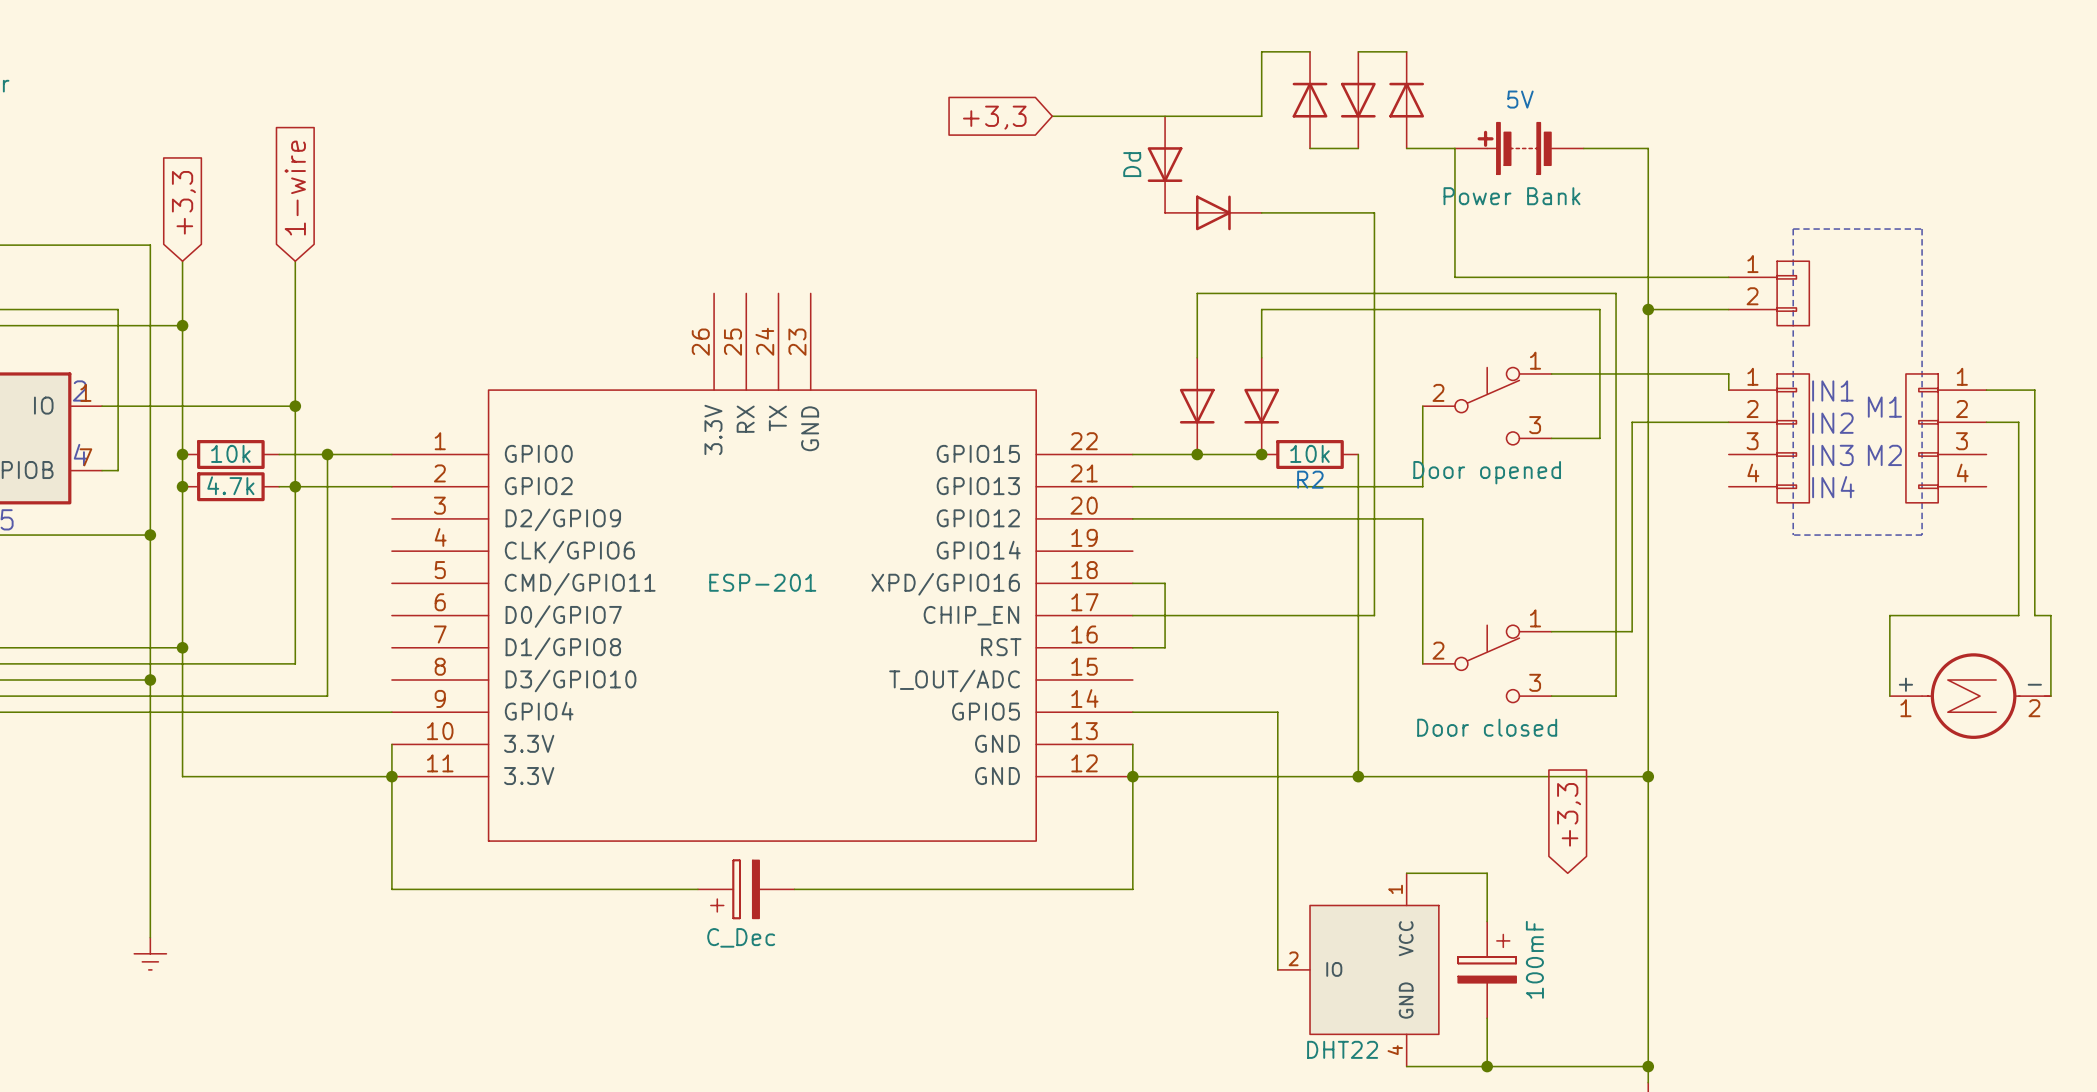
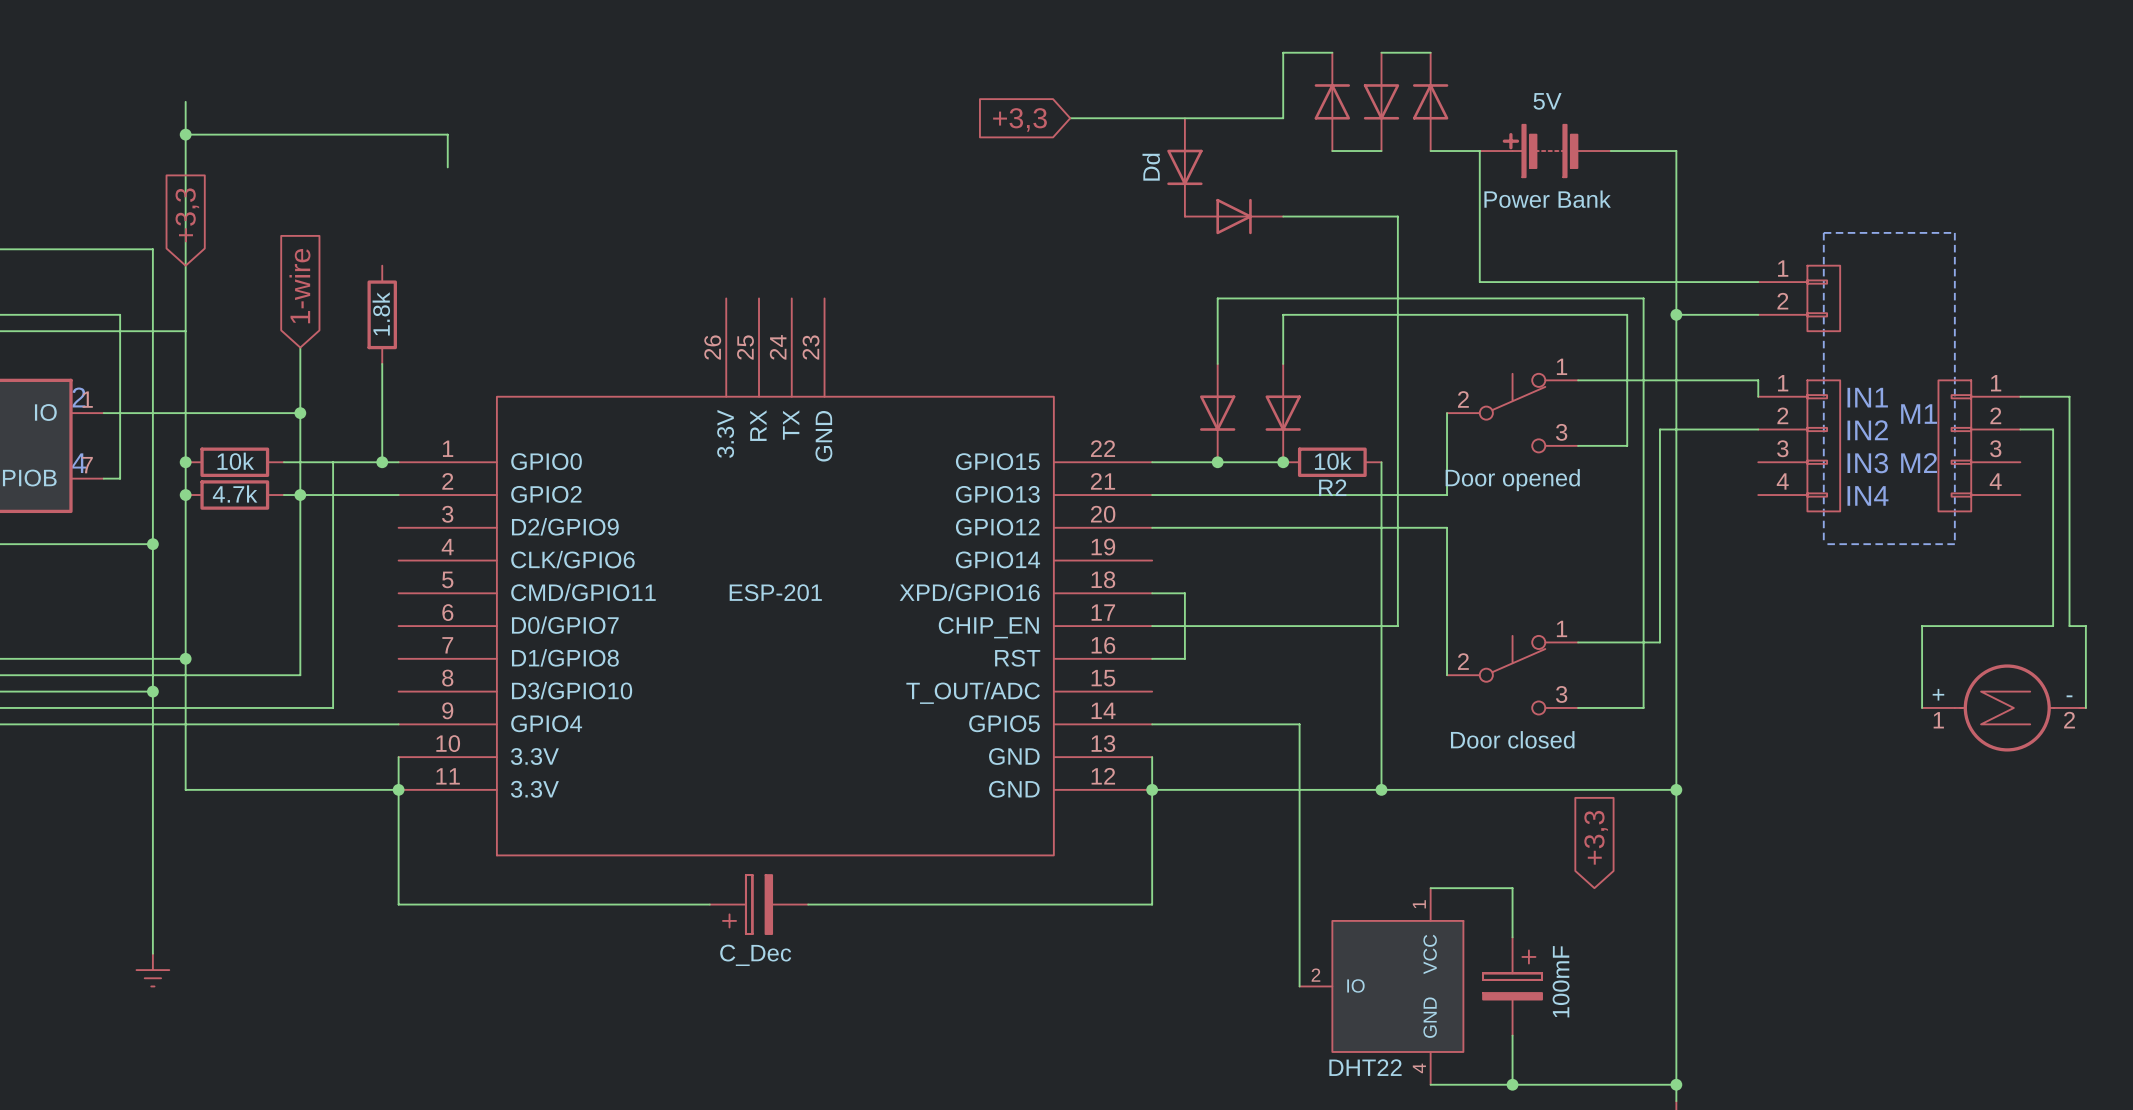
wire: none -> (185, 101) (185, 265)
wire: none -> (185, 134) (447, 134) (447, 167)
junction: none -> (185, 134)
global label position: 1-wire (295, 188) -> 1-wire (299, 286)
wire: (295, 261) (295, 341) -> none
part: none -> 1.8k (382, 314)
junction: (182, 325) -> none
wire: none -> (382, 363) (382, 462)
junction position: (327, 454) -> (382, 462)

